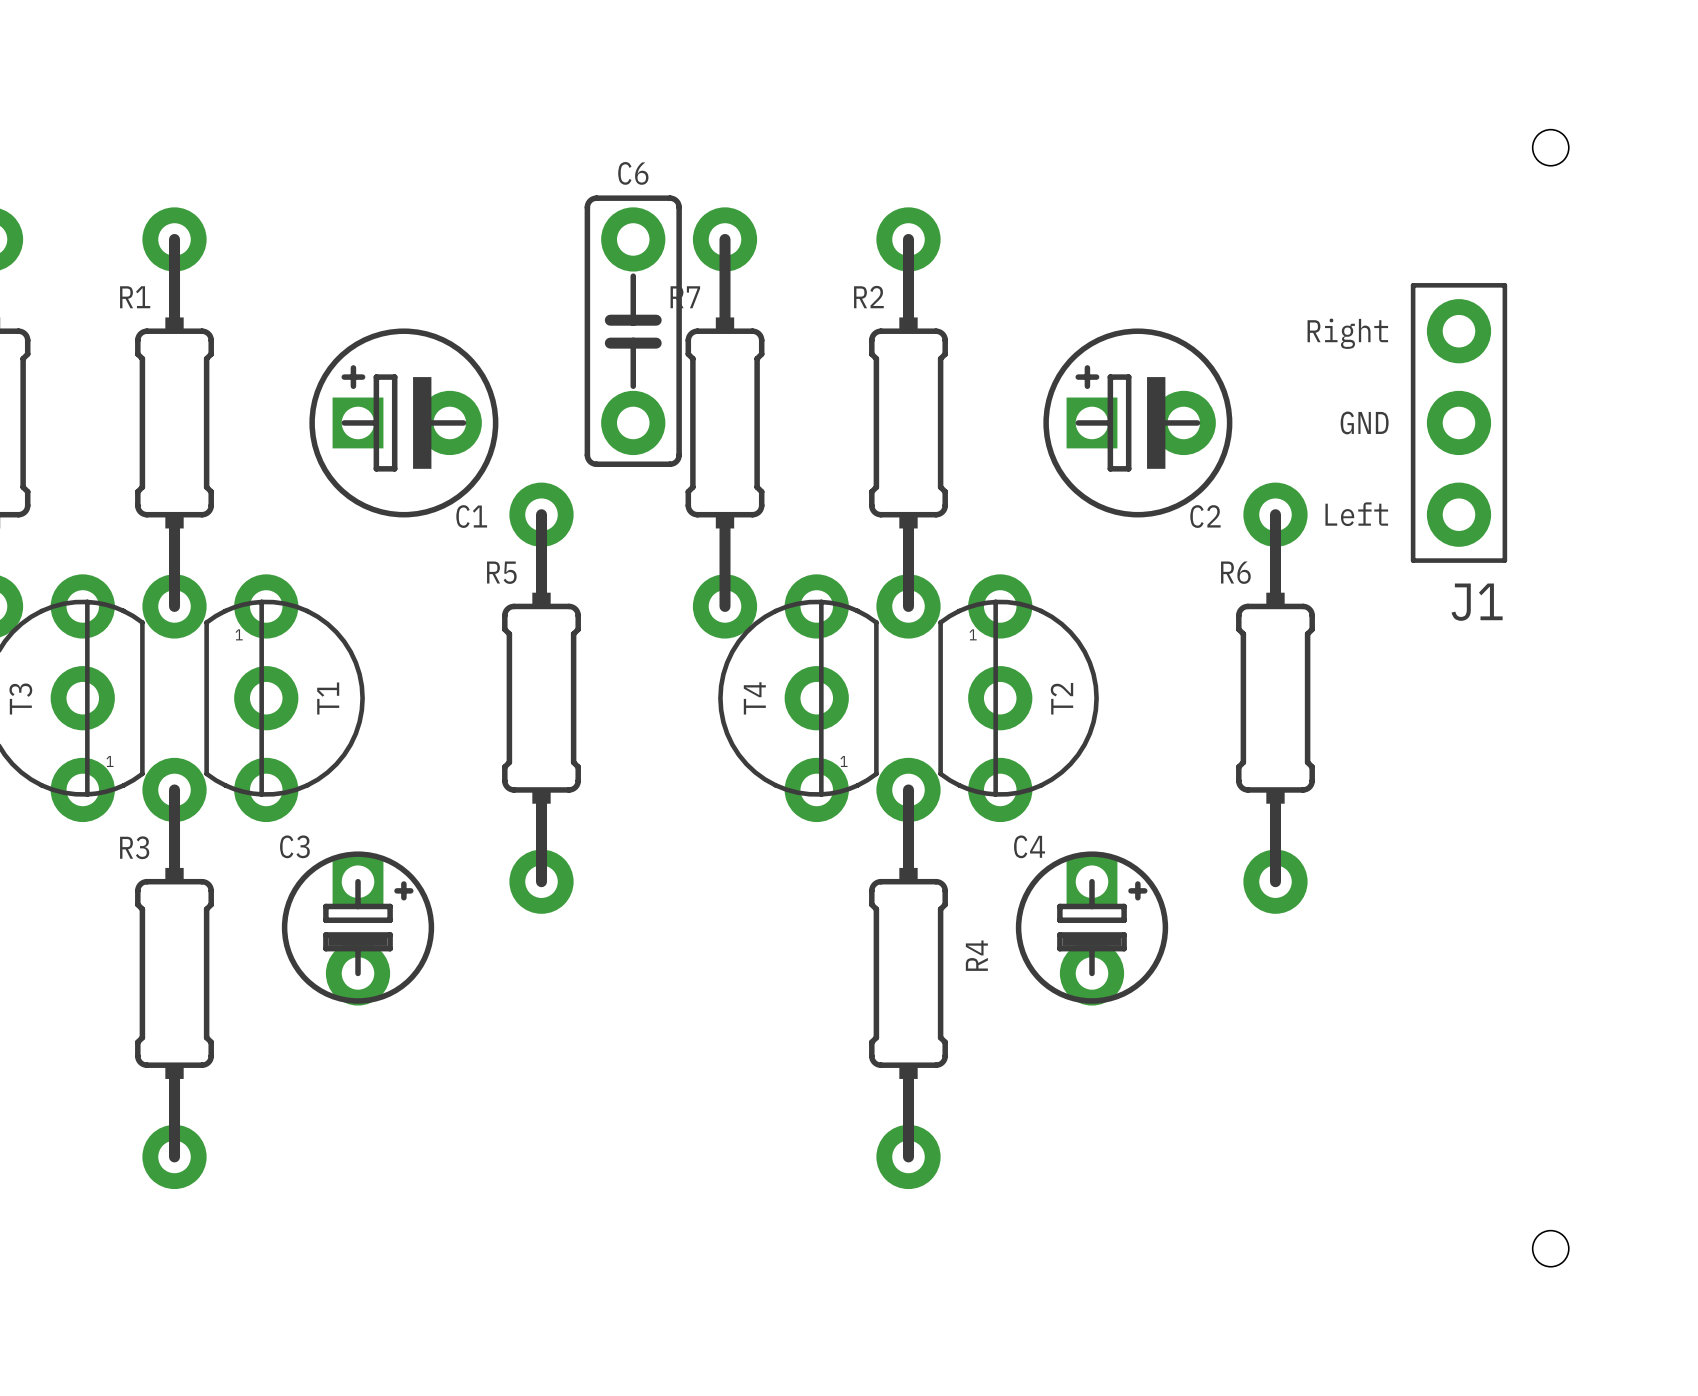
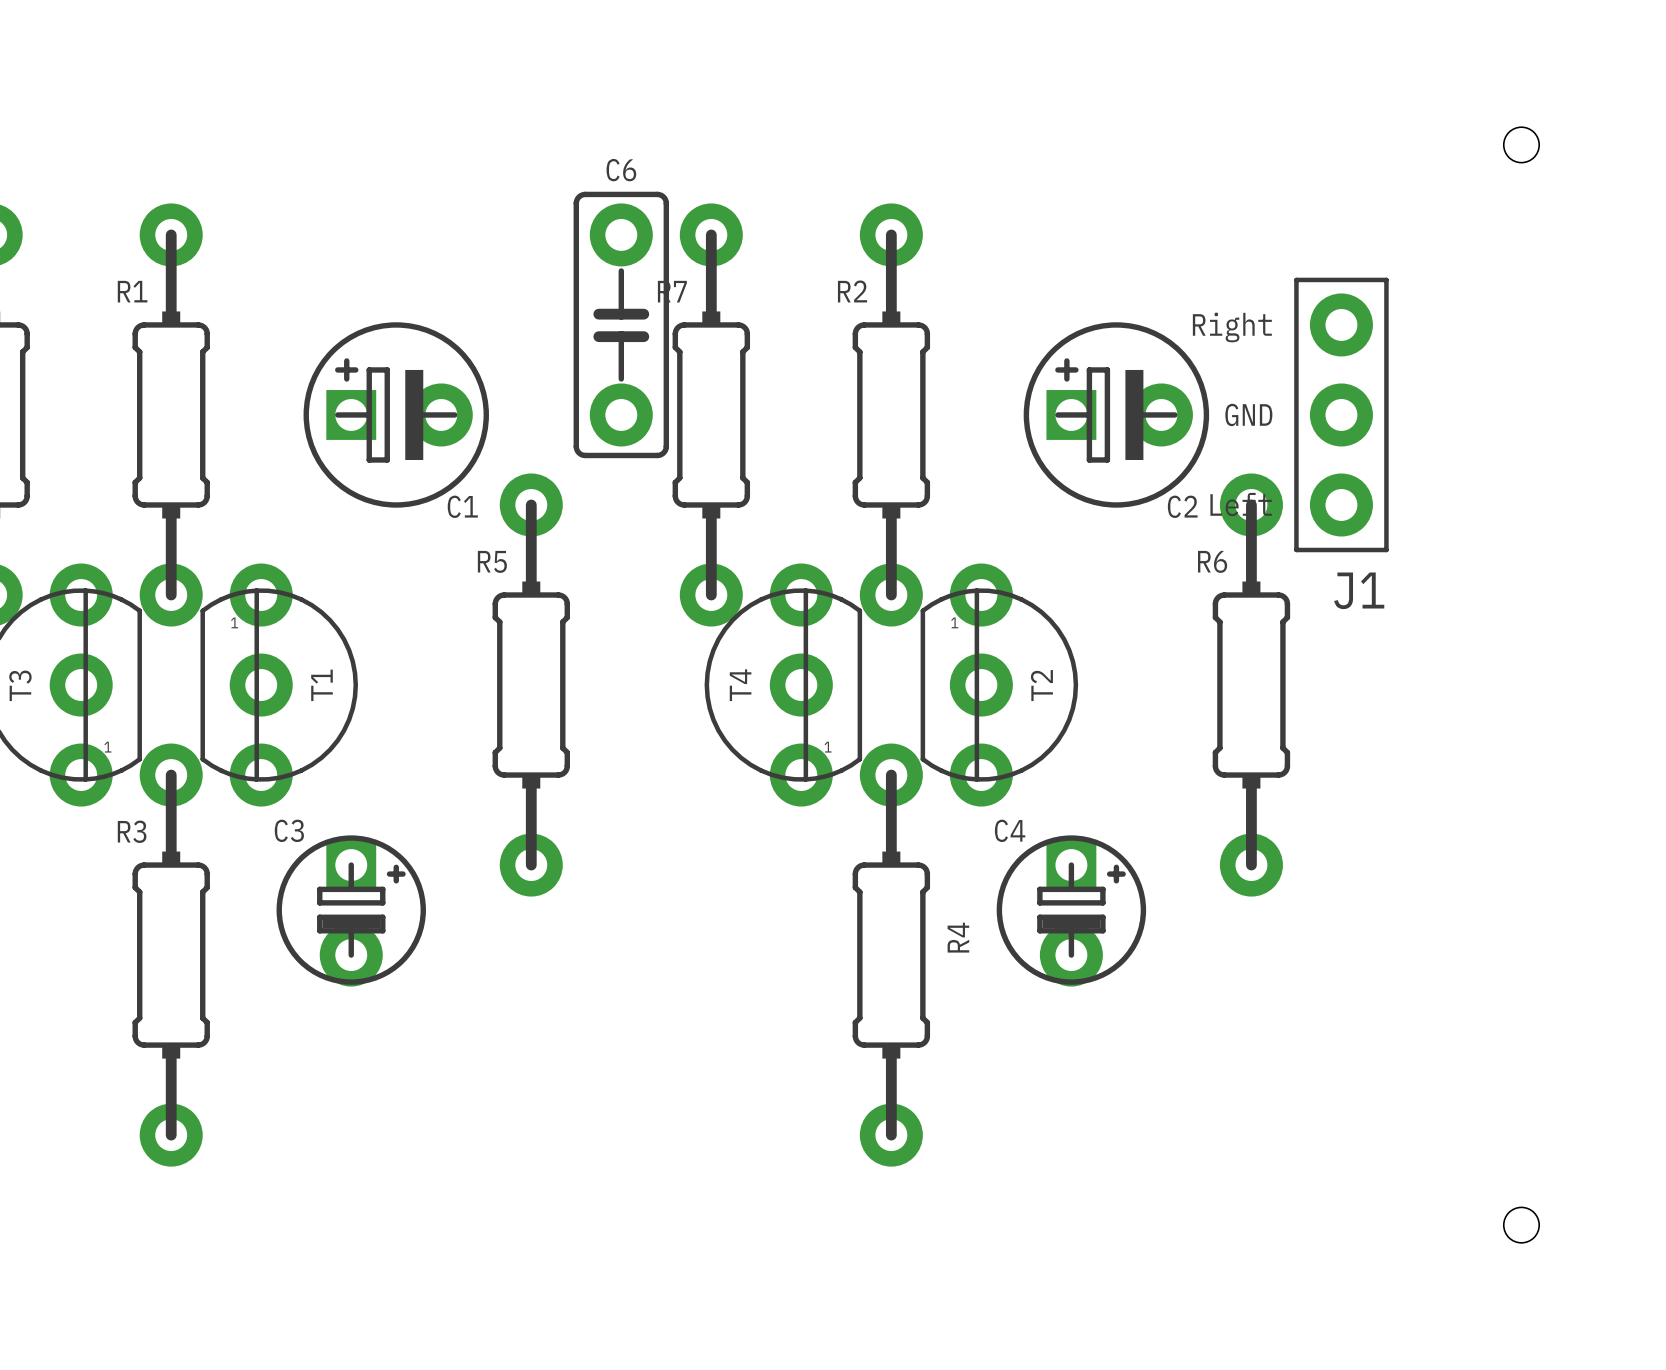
J1 position: (1458, 422) -> (1341, 414)

